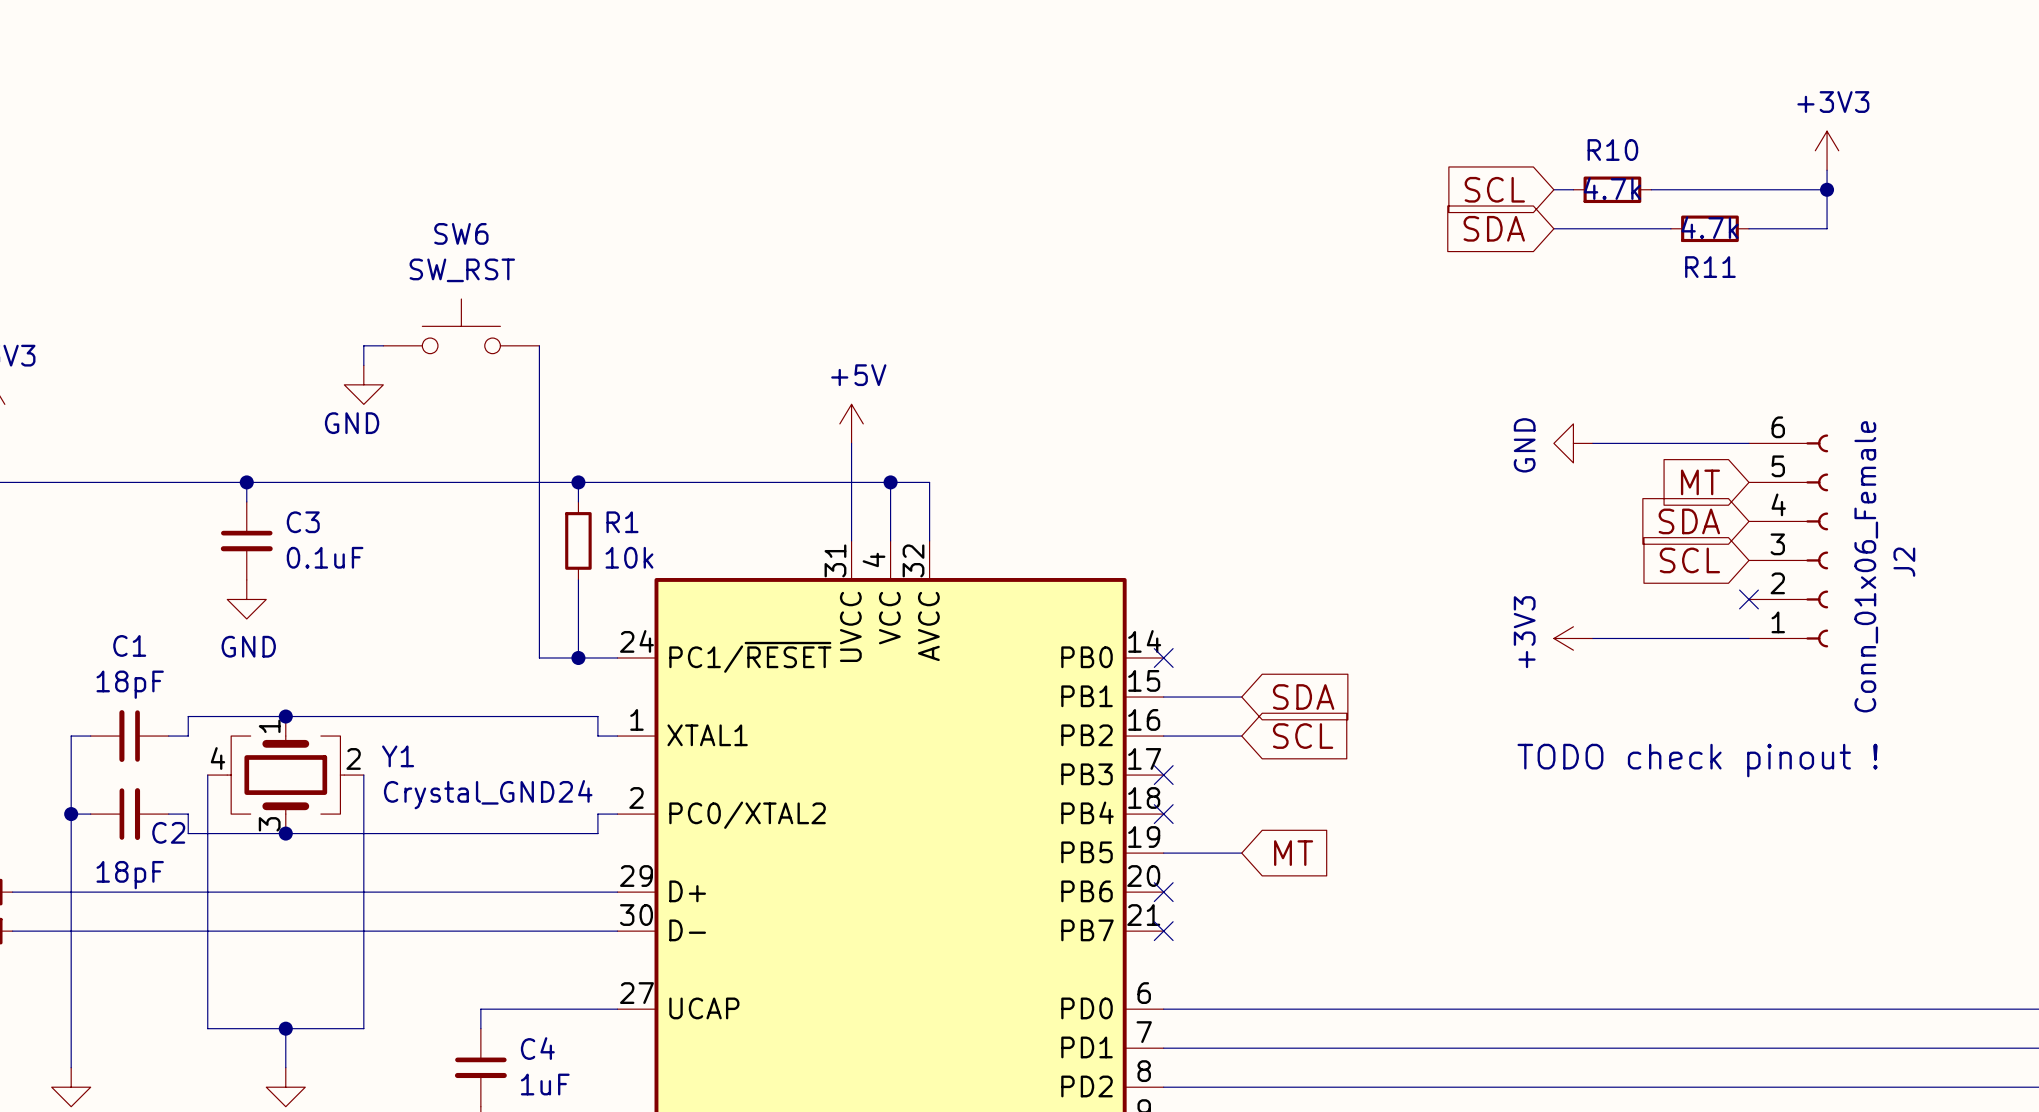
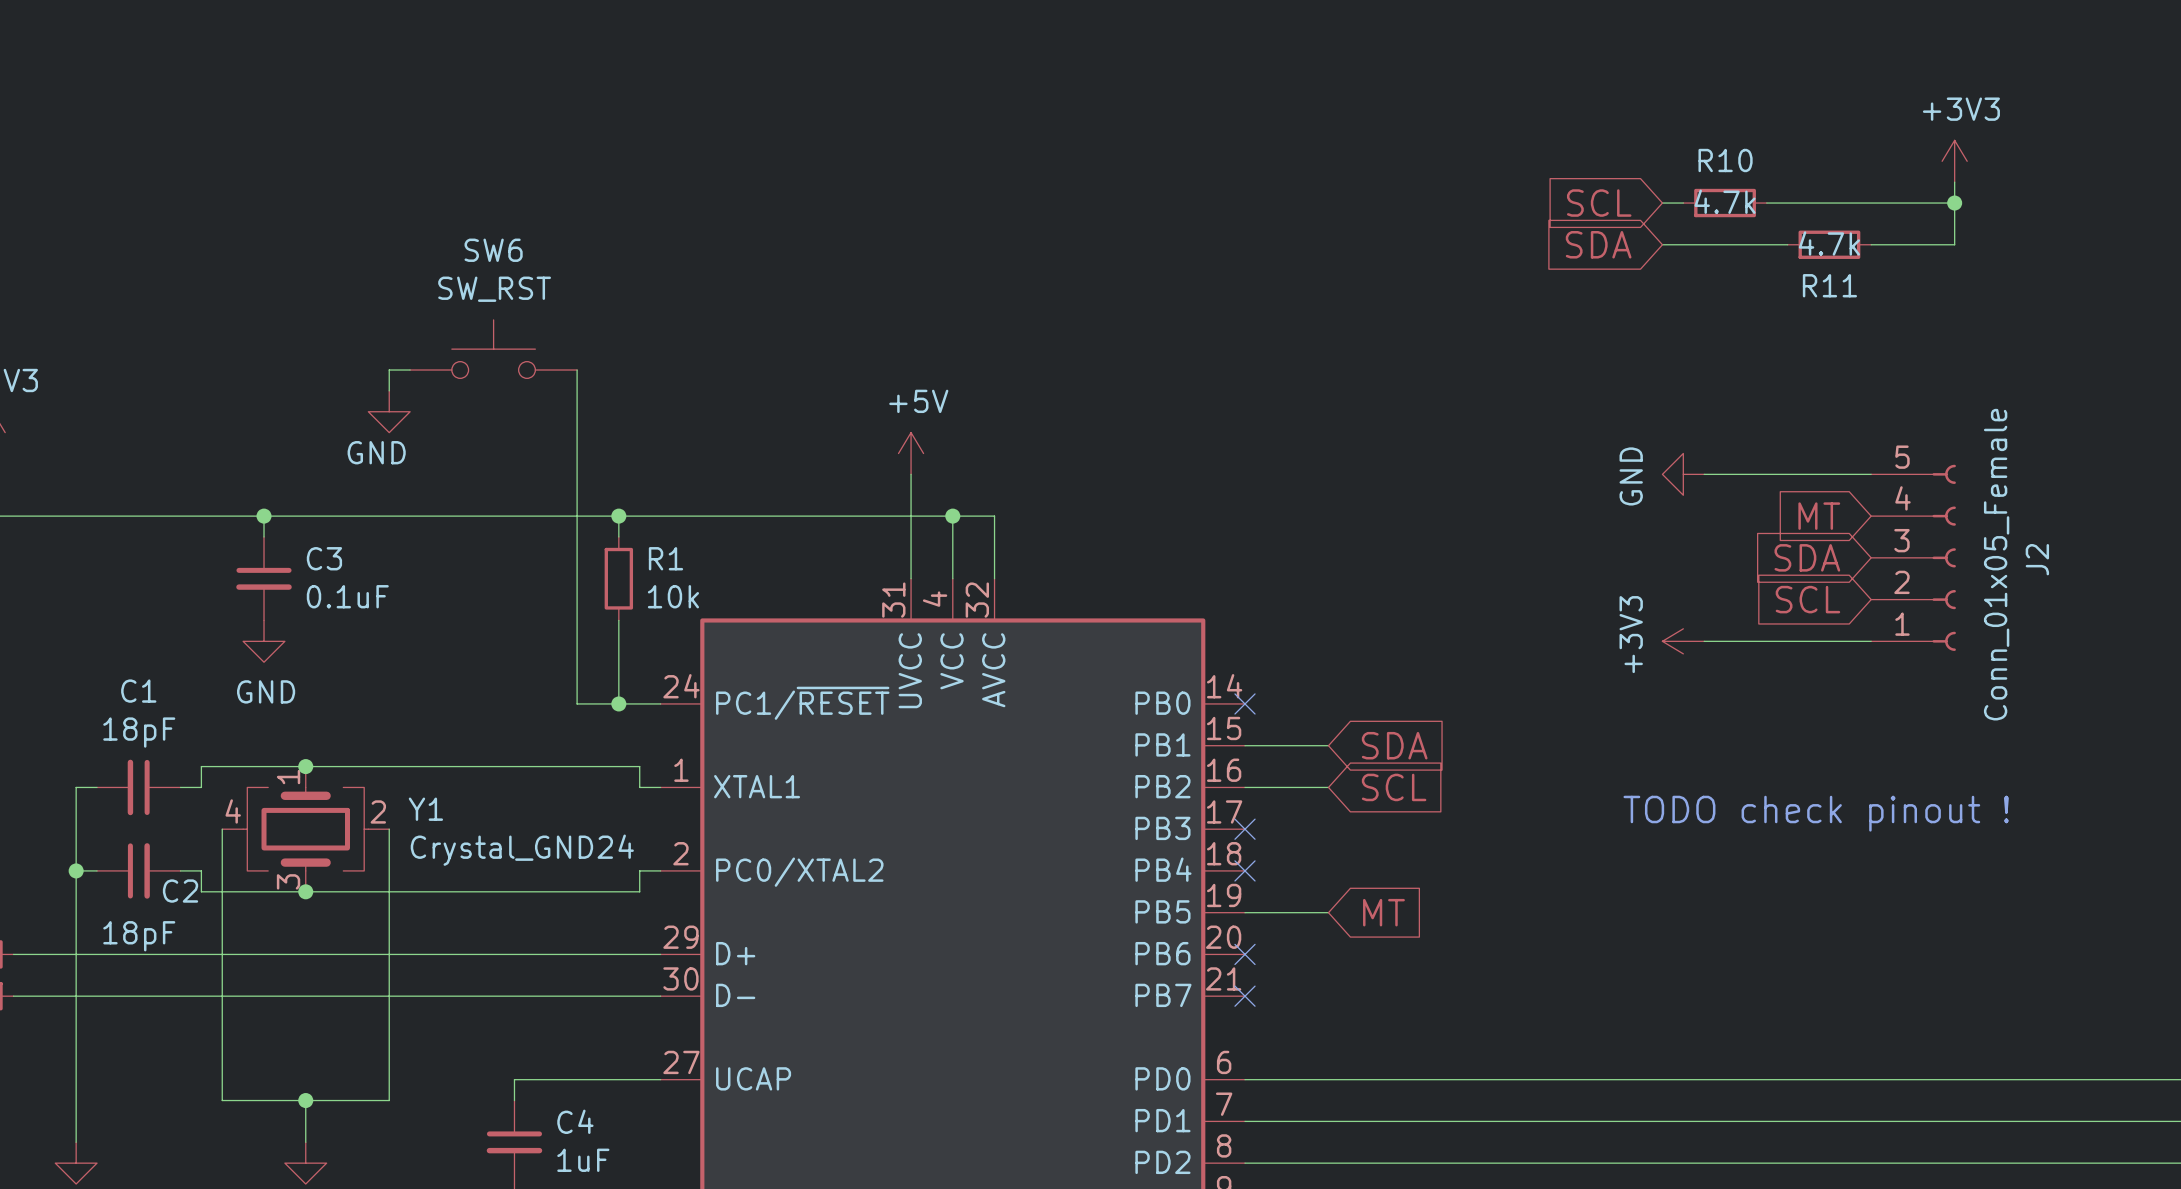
J2 symbol: [1748, 434, 1829, 648] -> [1871, 464, 1956, 651]
J2 value: Conn_01x06_Female (1866, 566) -> Conn_01x05_Female (1996, 564)
no-connect mark: (1748, 599) -> none
power symbol position: +3V3 (1573, 638) -> +3V3 (1683, 641)
wire: (1592, 638) (1748, 638) -> (1704, 641) (1871, 641)

